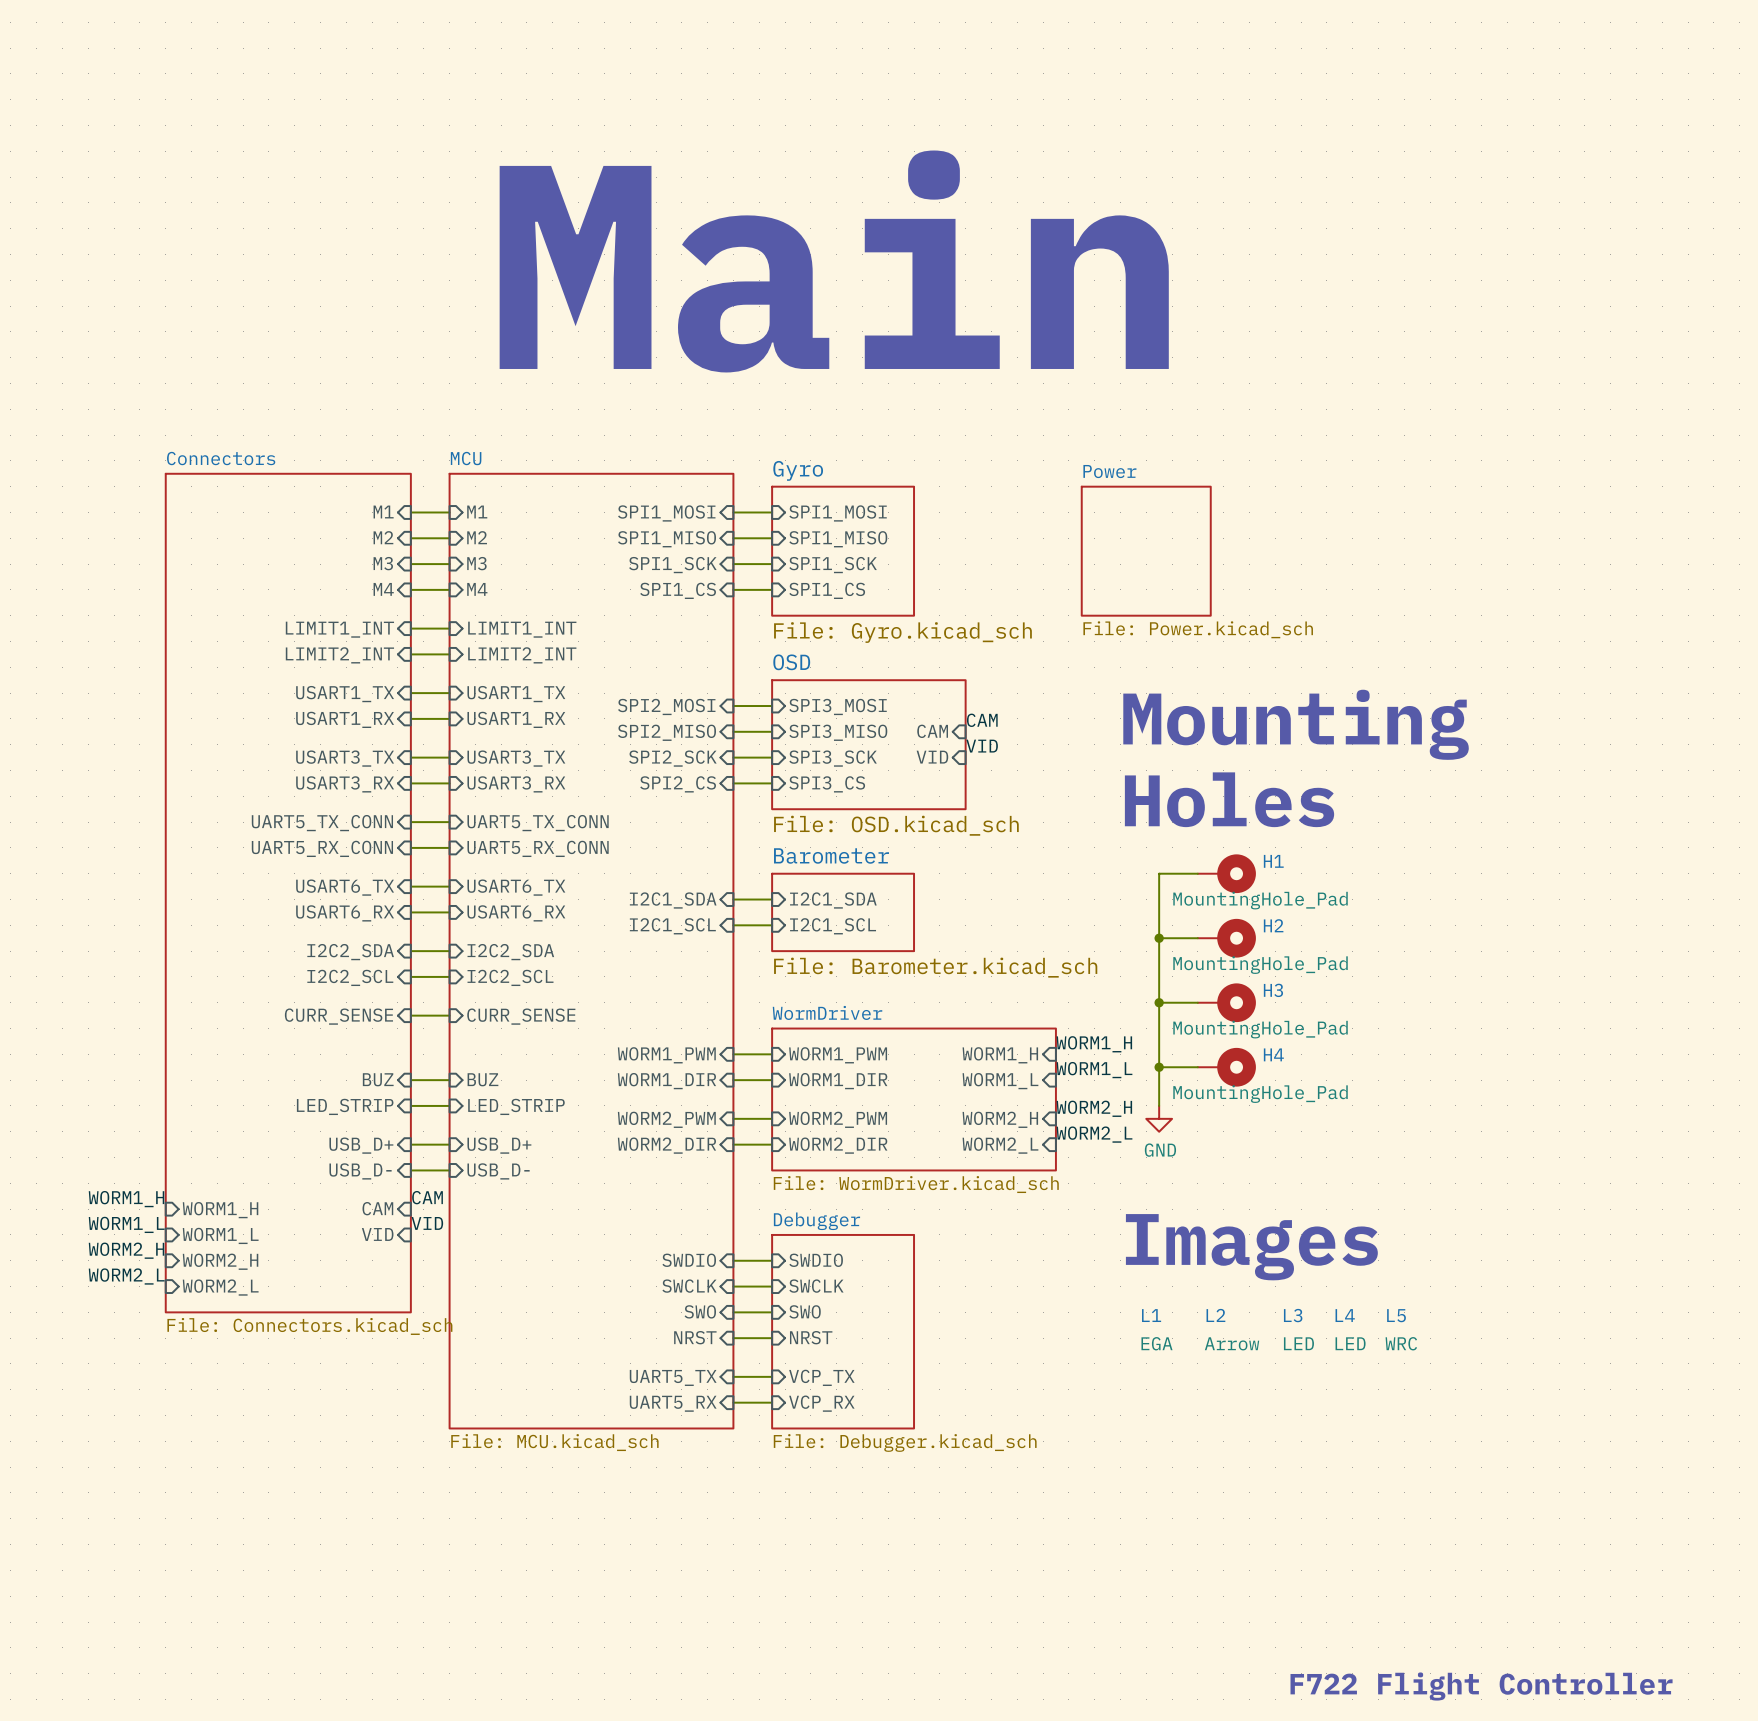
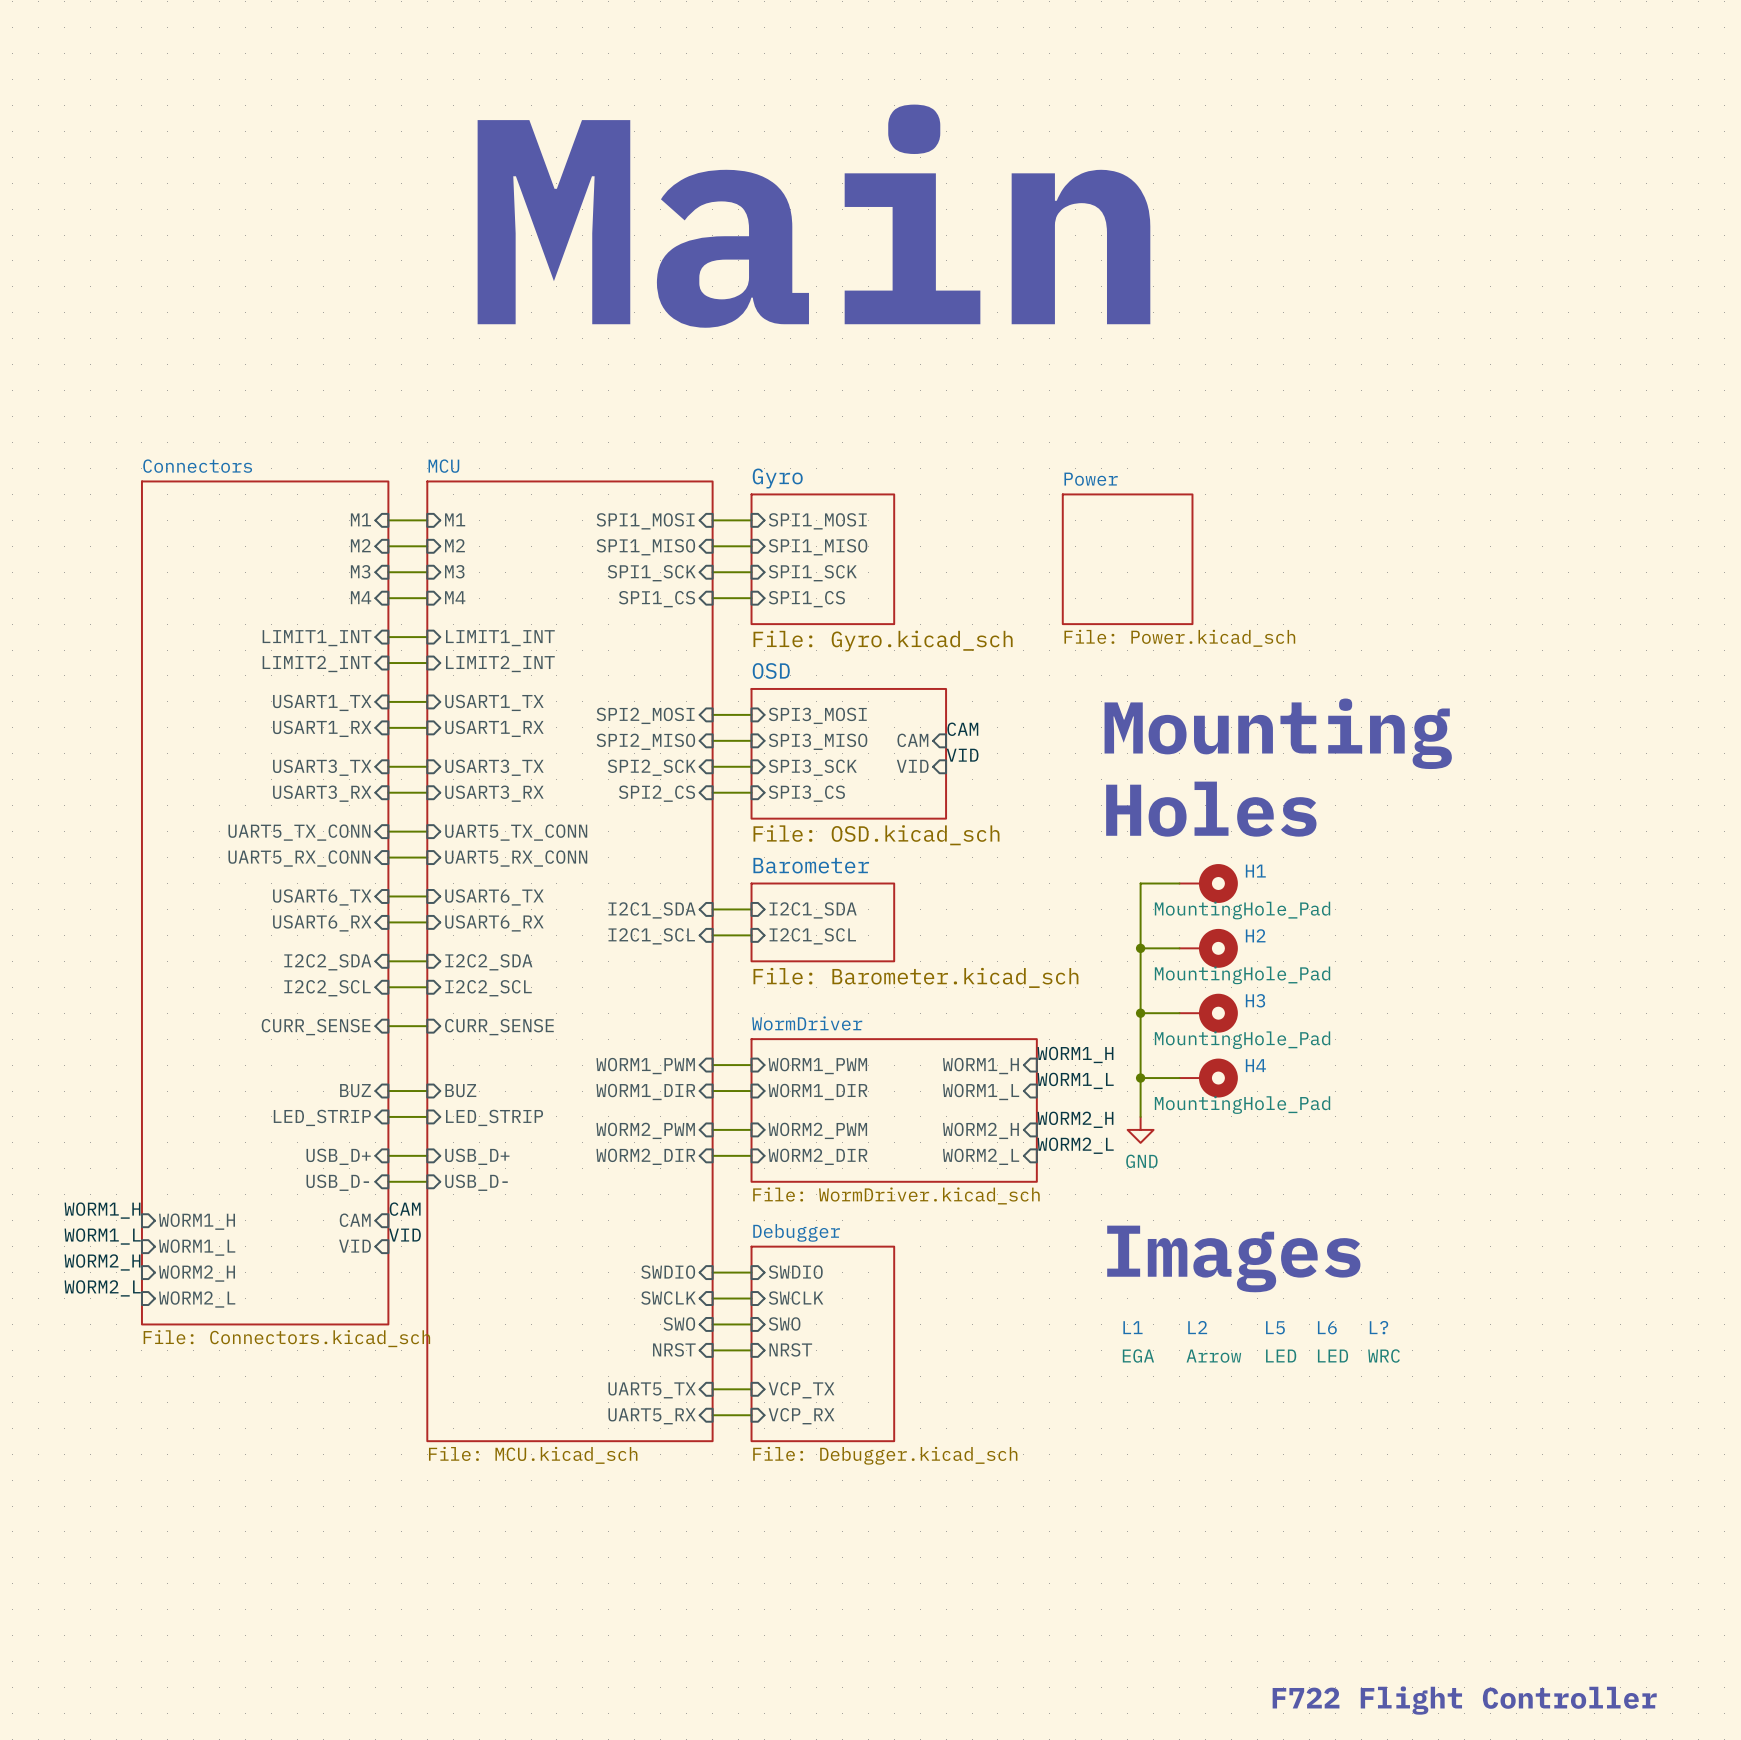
text position: Main (834, 261) -> Main (813, 216)
L3 name: L3 (1293, 1315) -> L5 (1275, 1327)
L4 name: L4 (1345, 1315) -> L6 (1327, 1327)
L5 name: L5 (1396, 1315) -> L? (1378, 1327)

